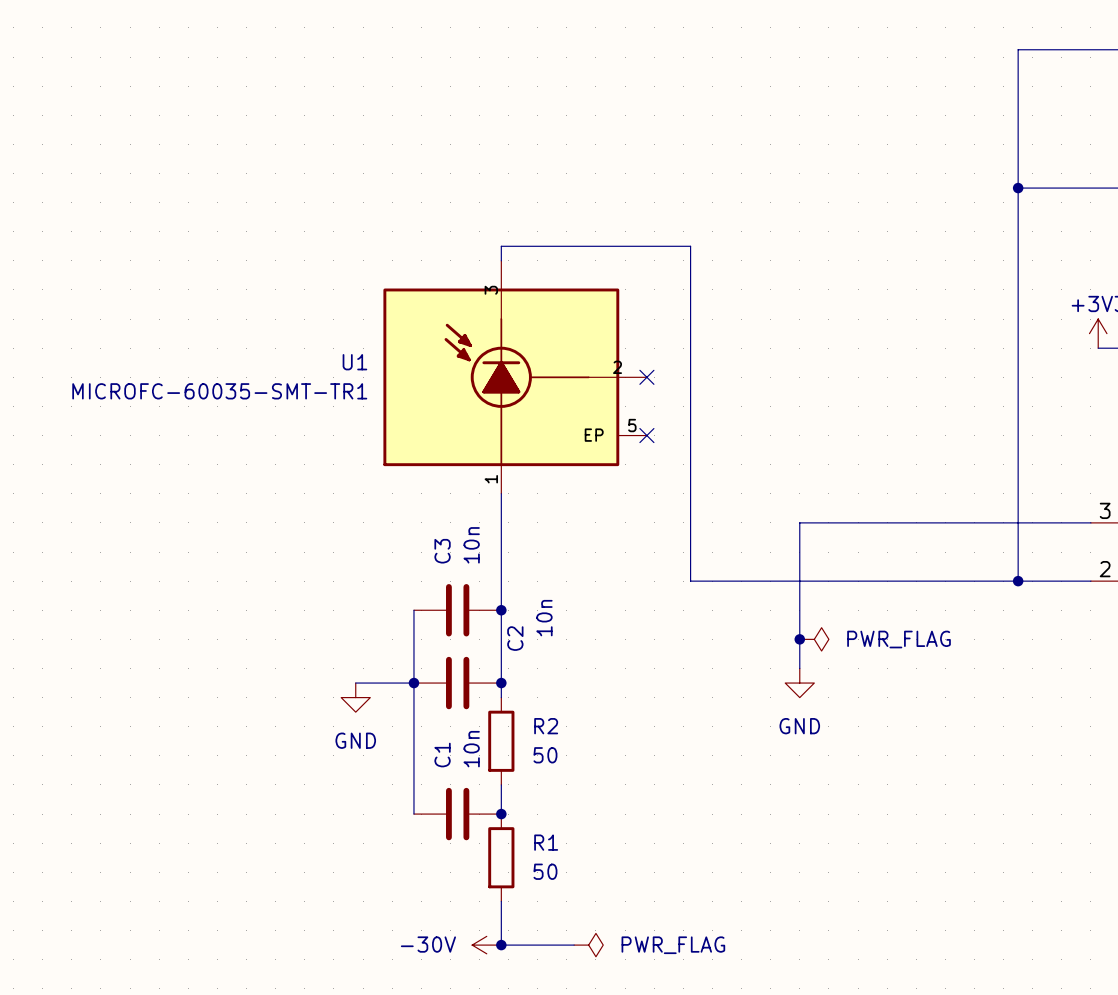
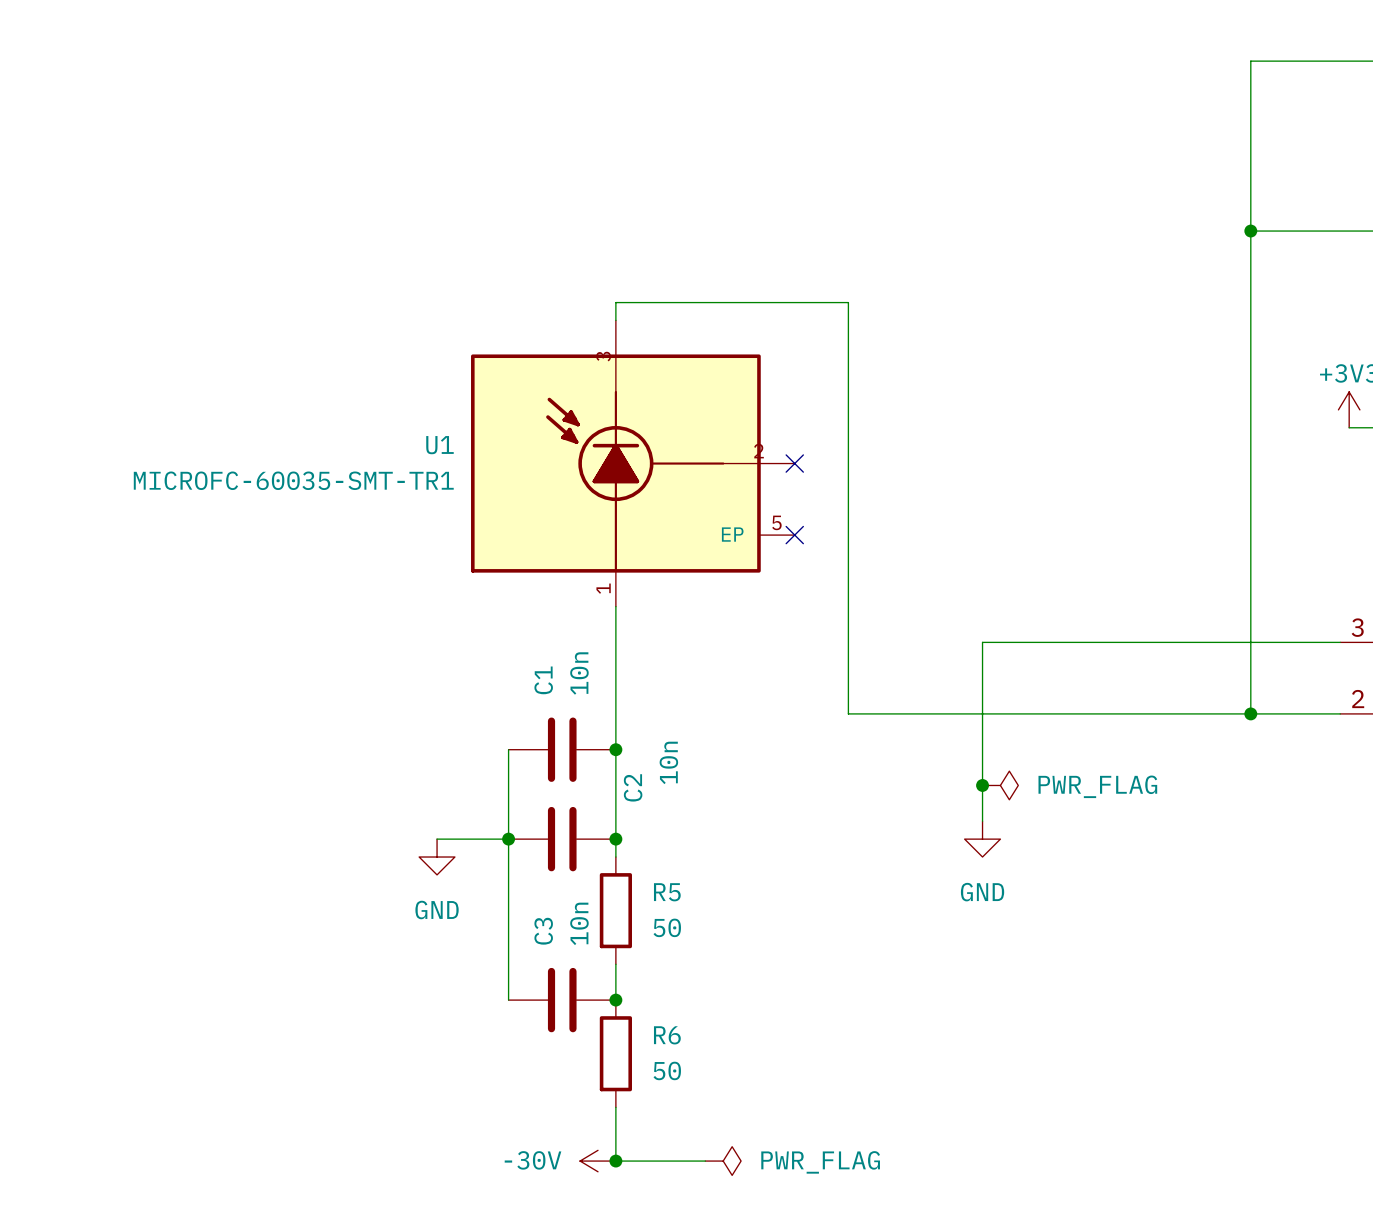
C3 name: C3 (442, 551) -> C1 (543, 680)
R2 name: R2 (546, 726) -> R5 (667, 892)
C1 name: C1 (442, 755) -> C3 (543, 931)
R1 name: R1 (546, 842) -> R6 (667, 1035)

